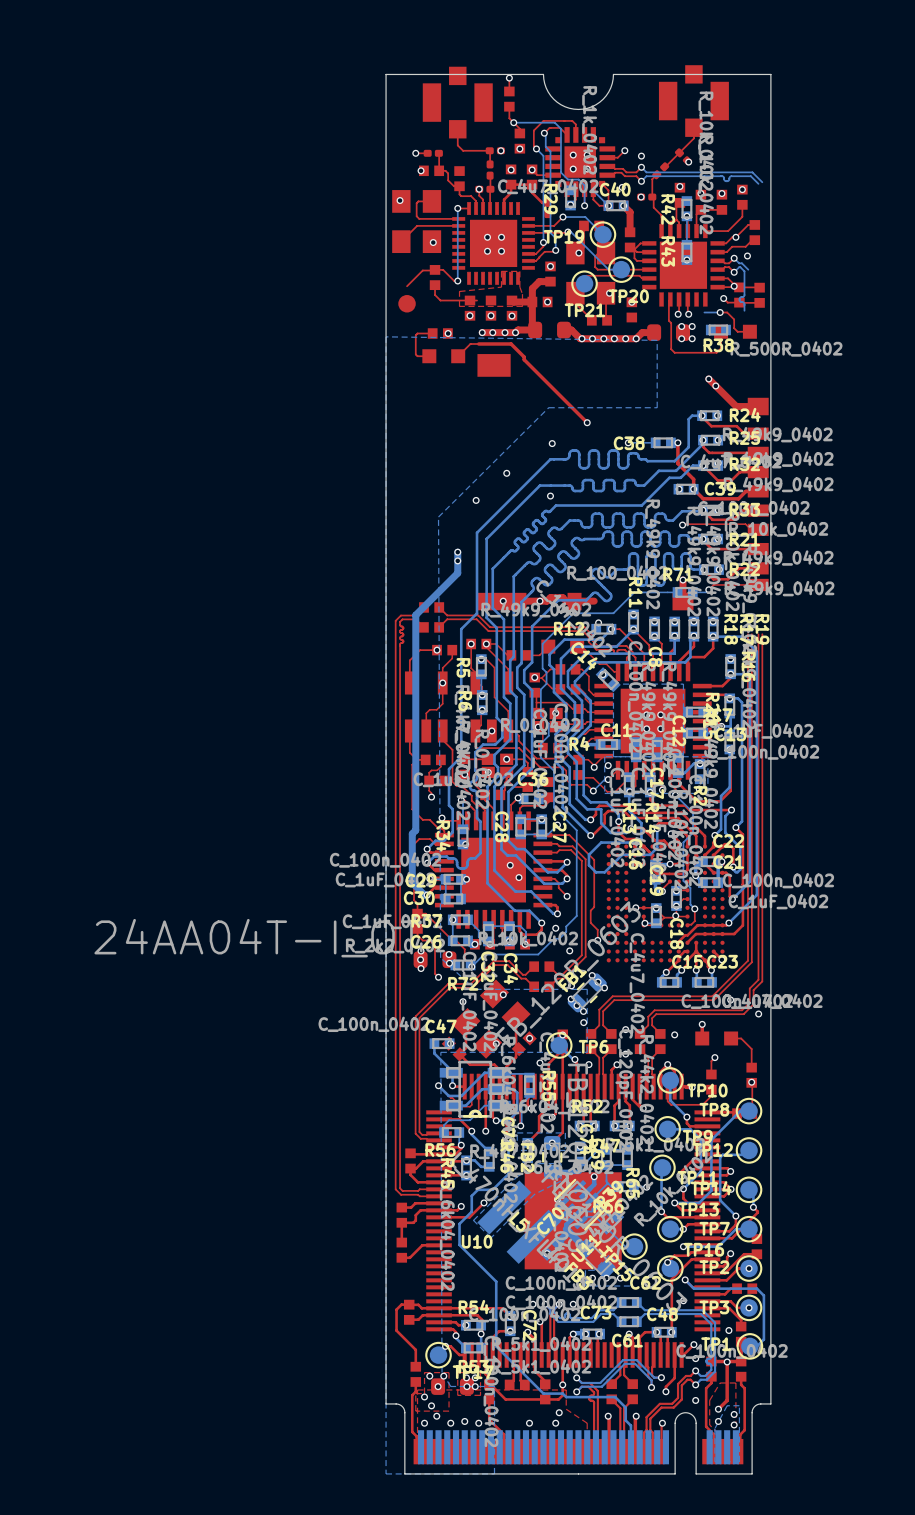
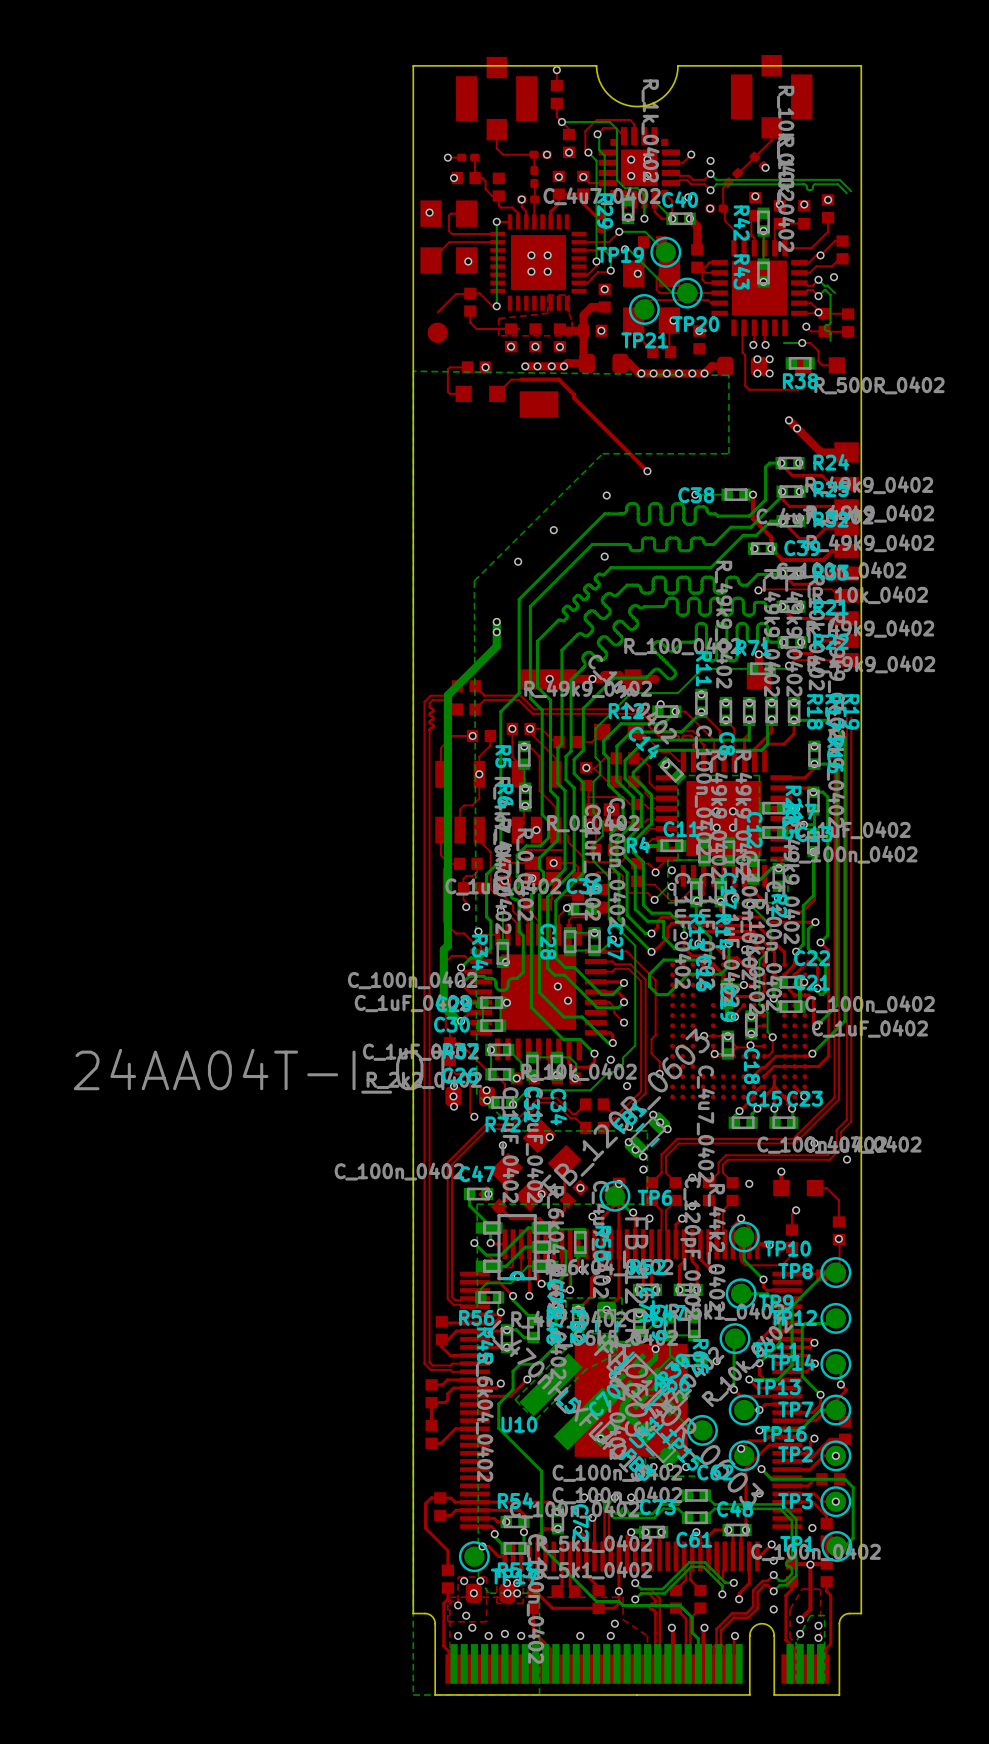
top track: (513, 748) (519, 748) (532, 761) (540, 767) (543, 767) -> none

